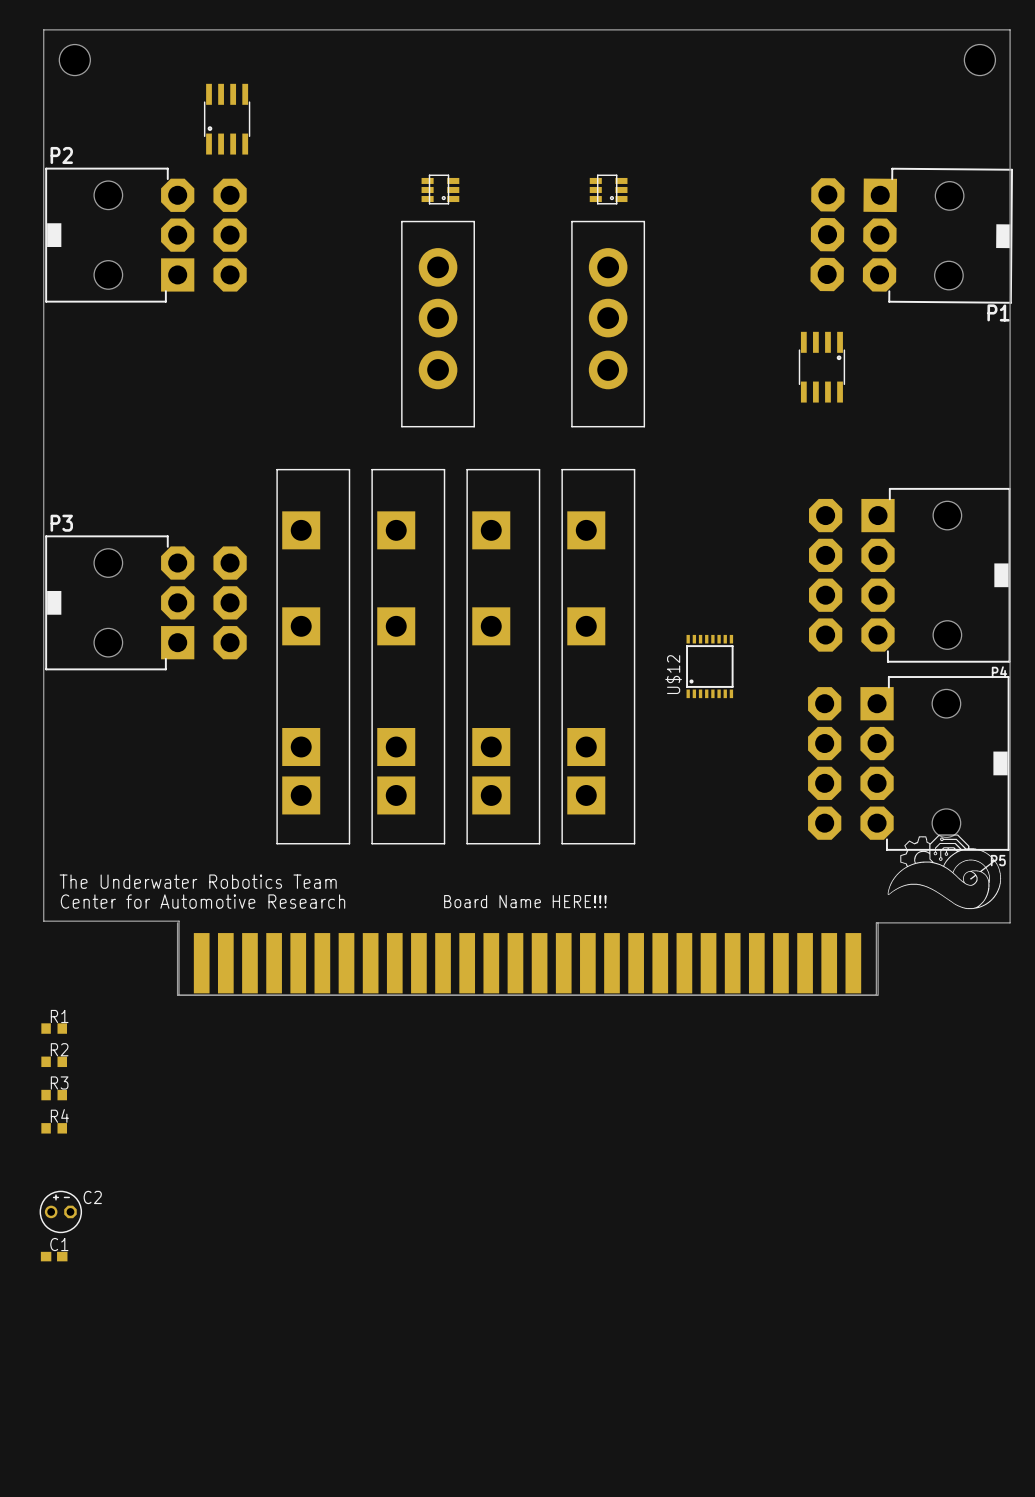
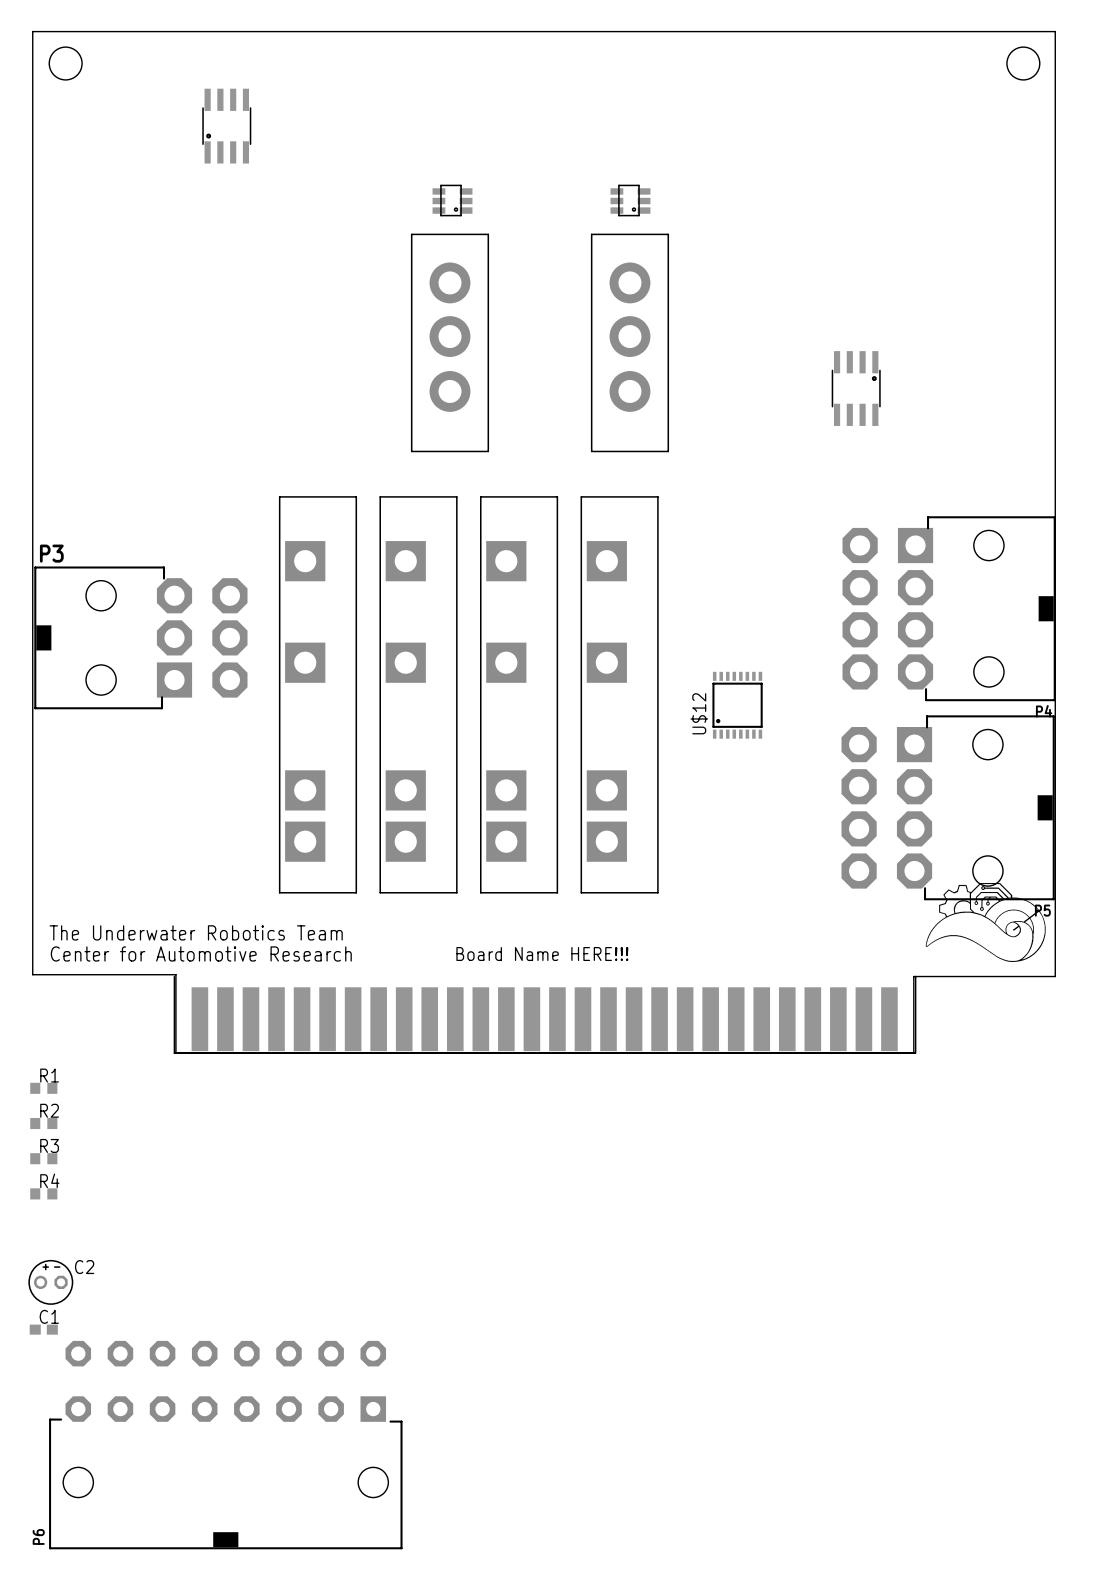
P2: (145, 235) -> none
P1: (911, 235) -> none
P6: none -> (225, 1445)

